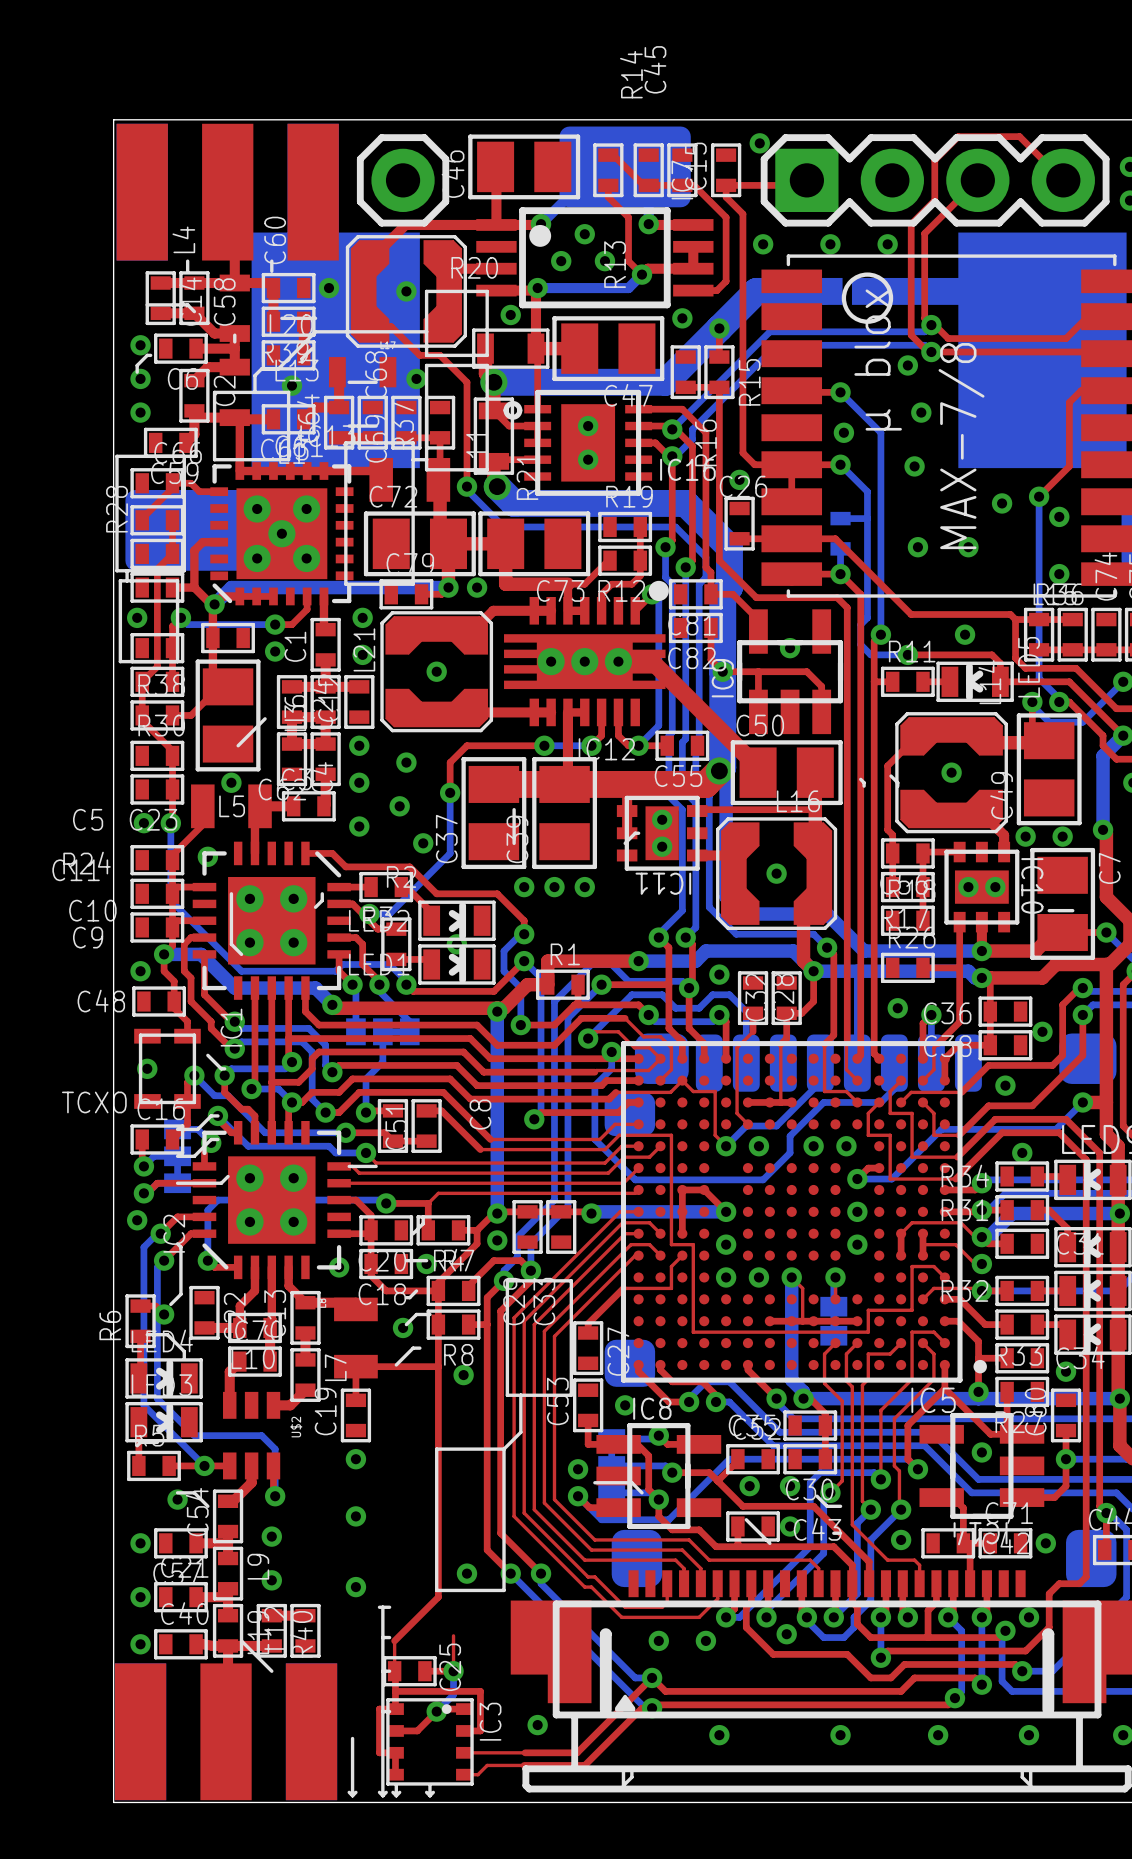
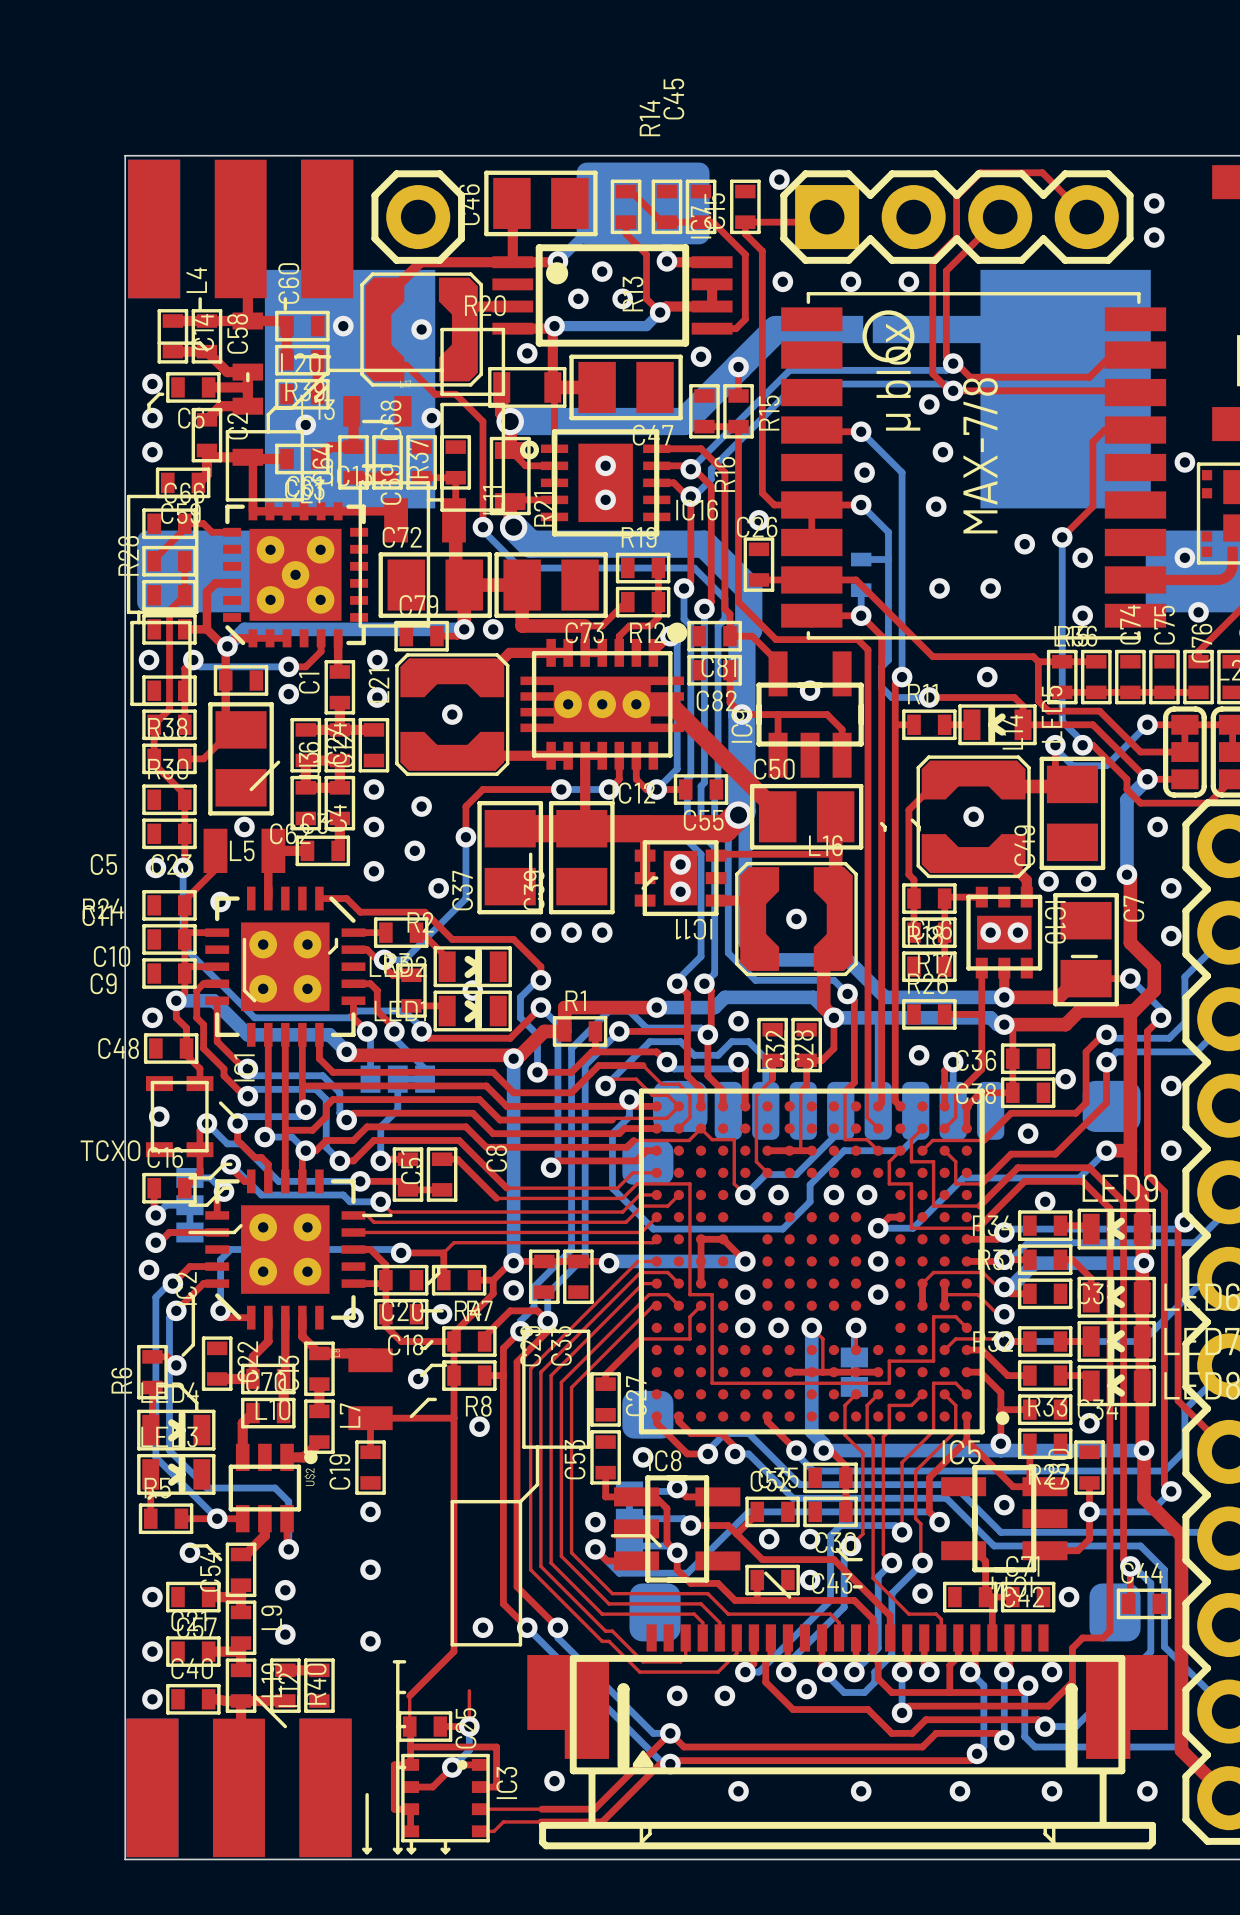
IC12 footprint: [504, 580, 669, 727] -> [520, 622, 688, 770]
U$2 footprint: [223, 1391, 281, 1480] -> [228, 1443, 318, 1533]

